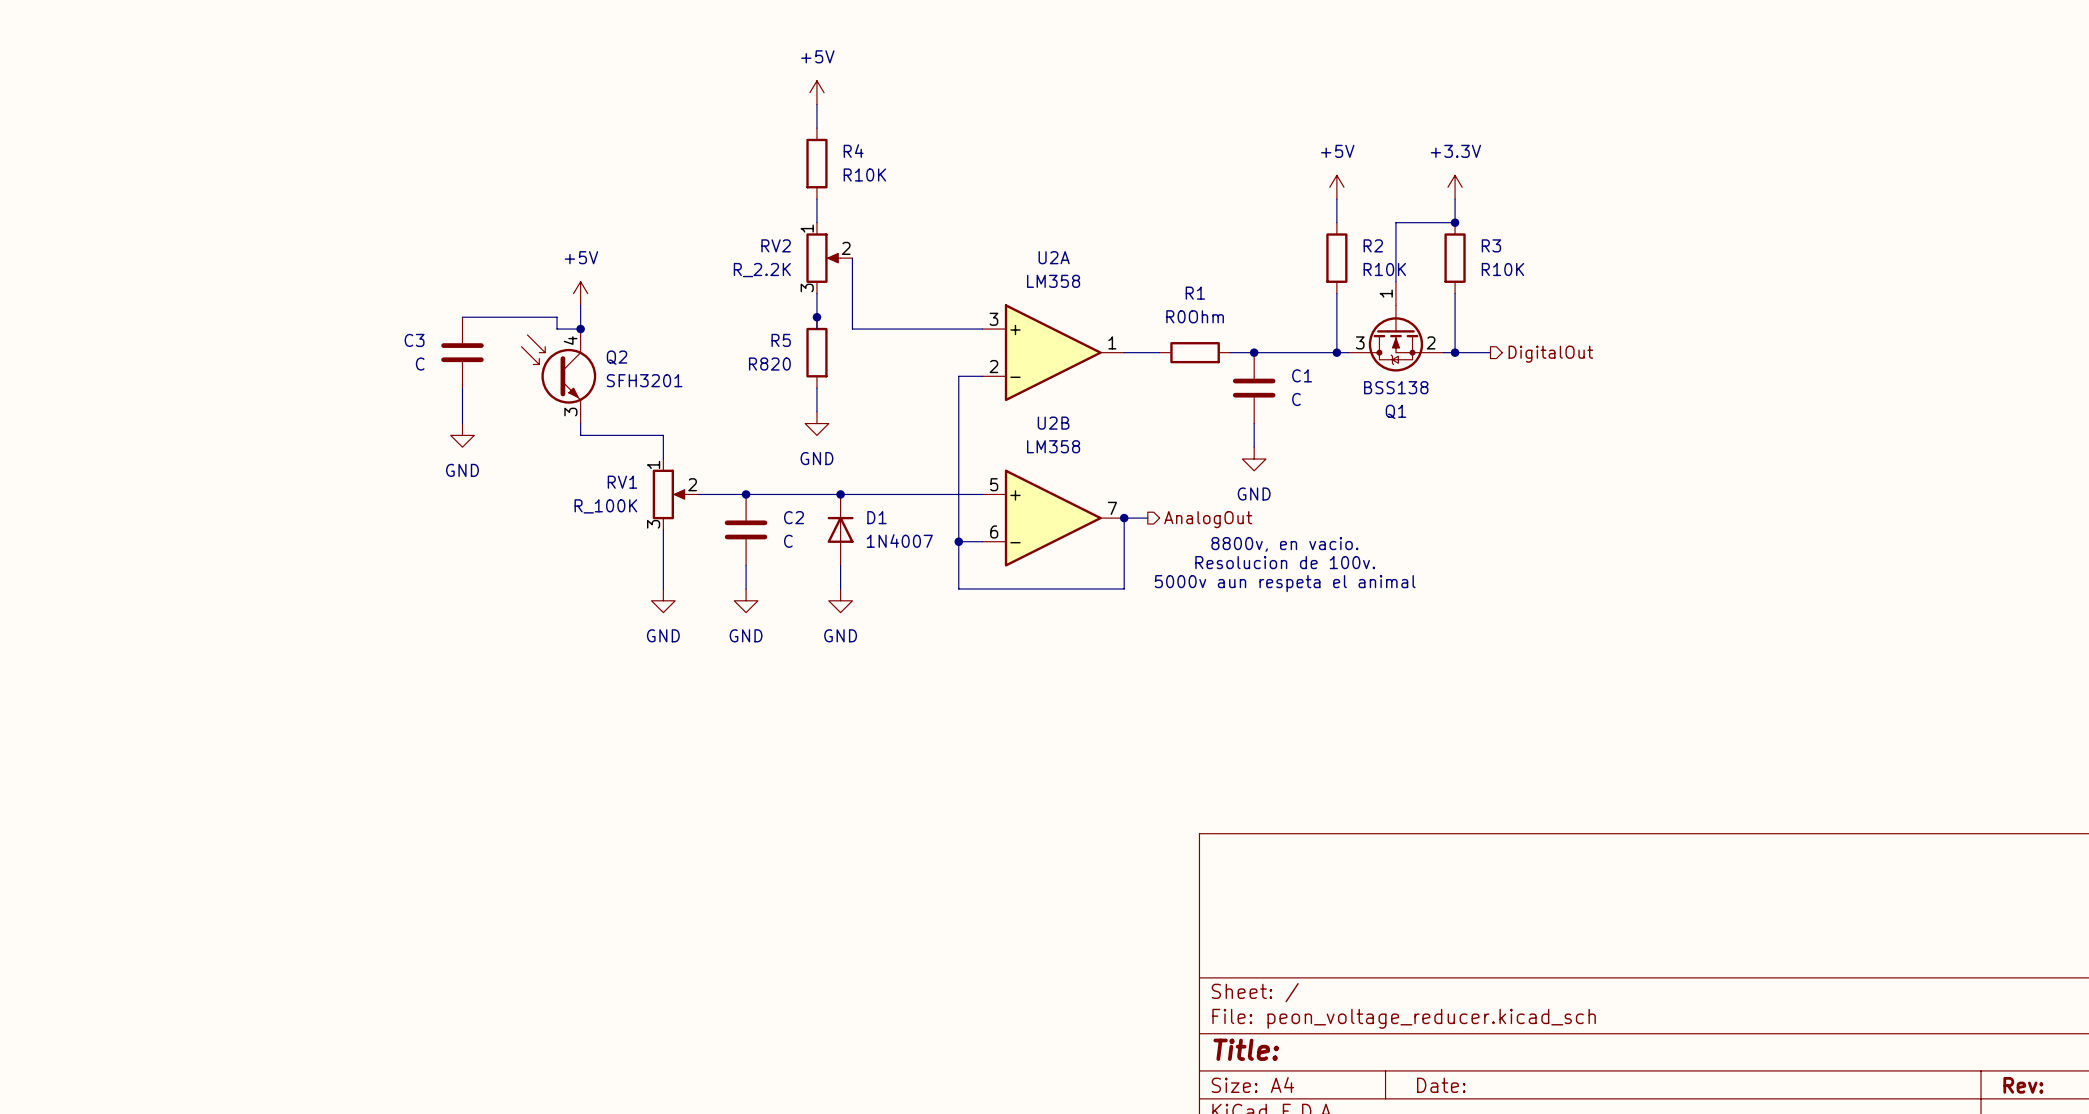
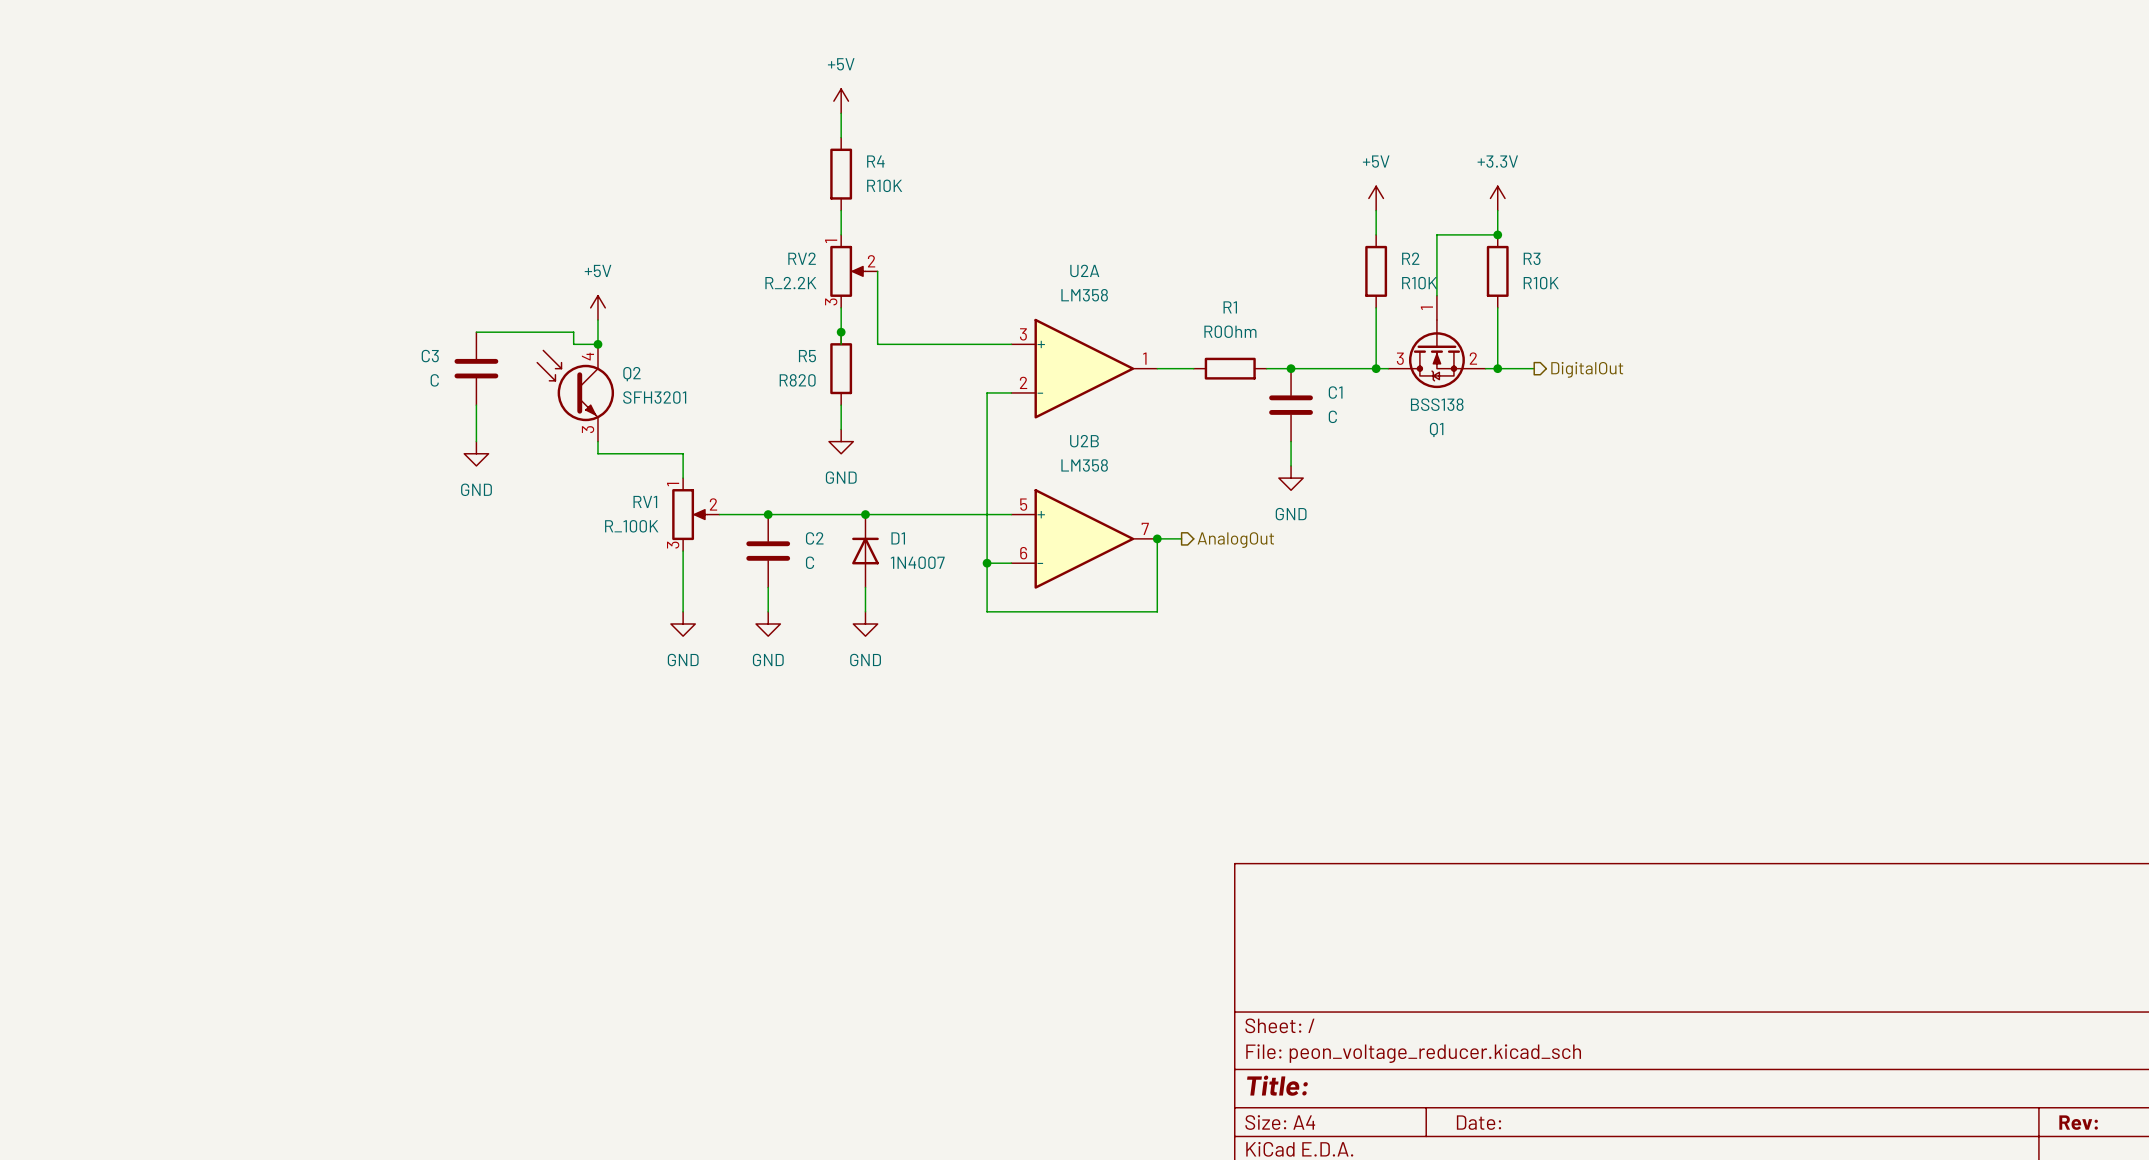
text: 8800v, en vacio. (1284, 544) -> none
text: Resolucion de 100v. (1285, 562) -> none
text: 5000v aun respeta el animal (1285, 583) -> none

